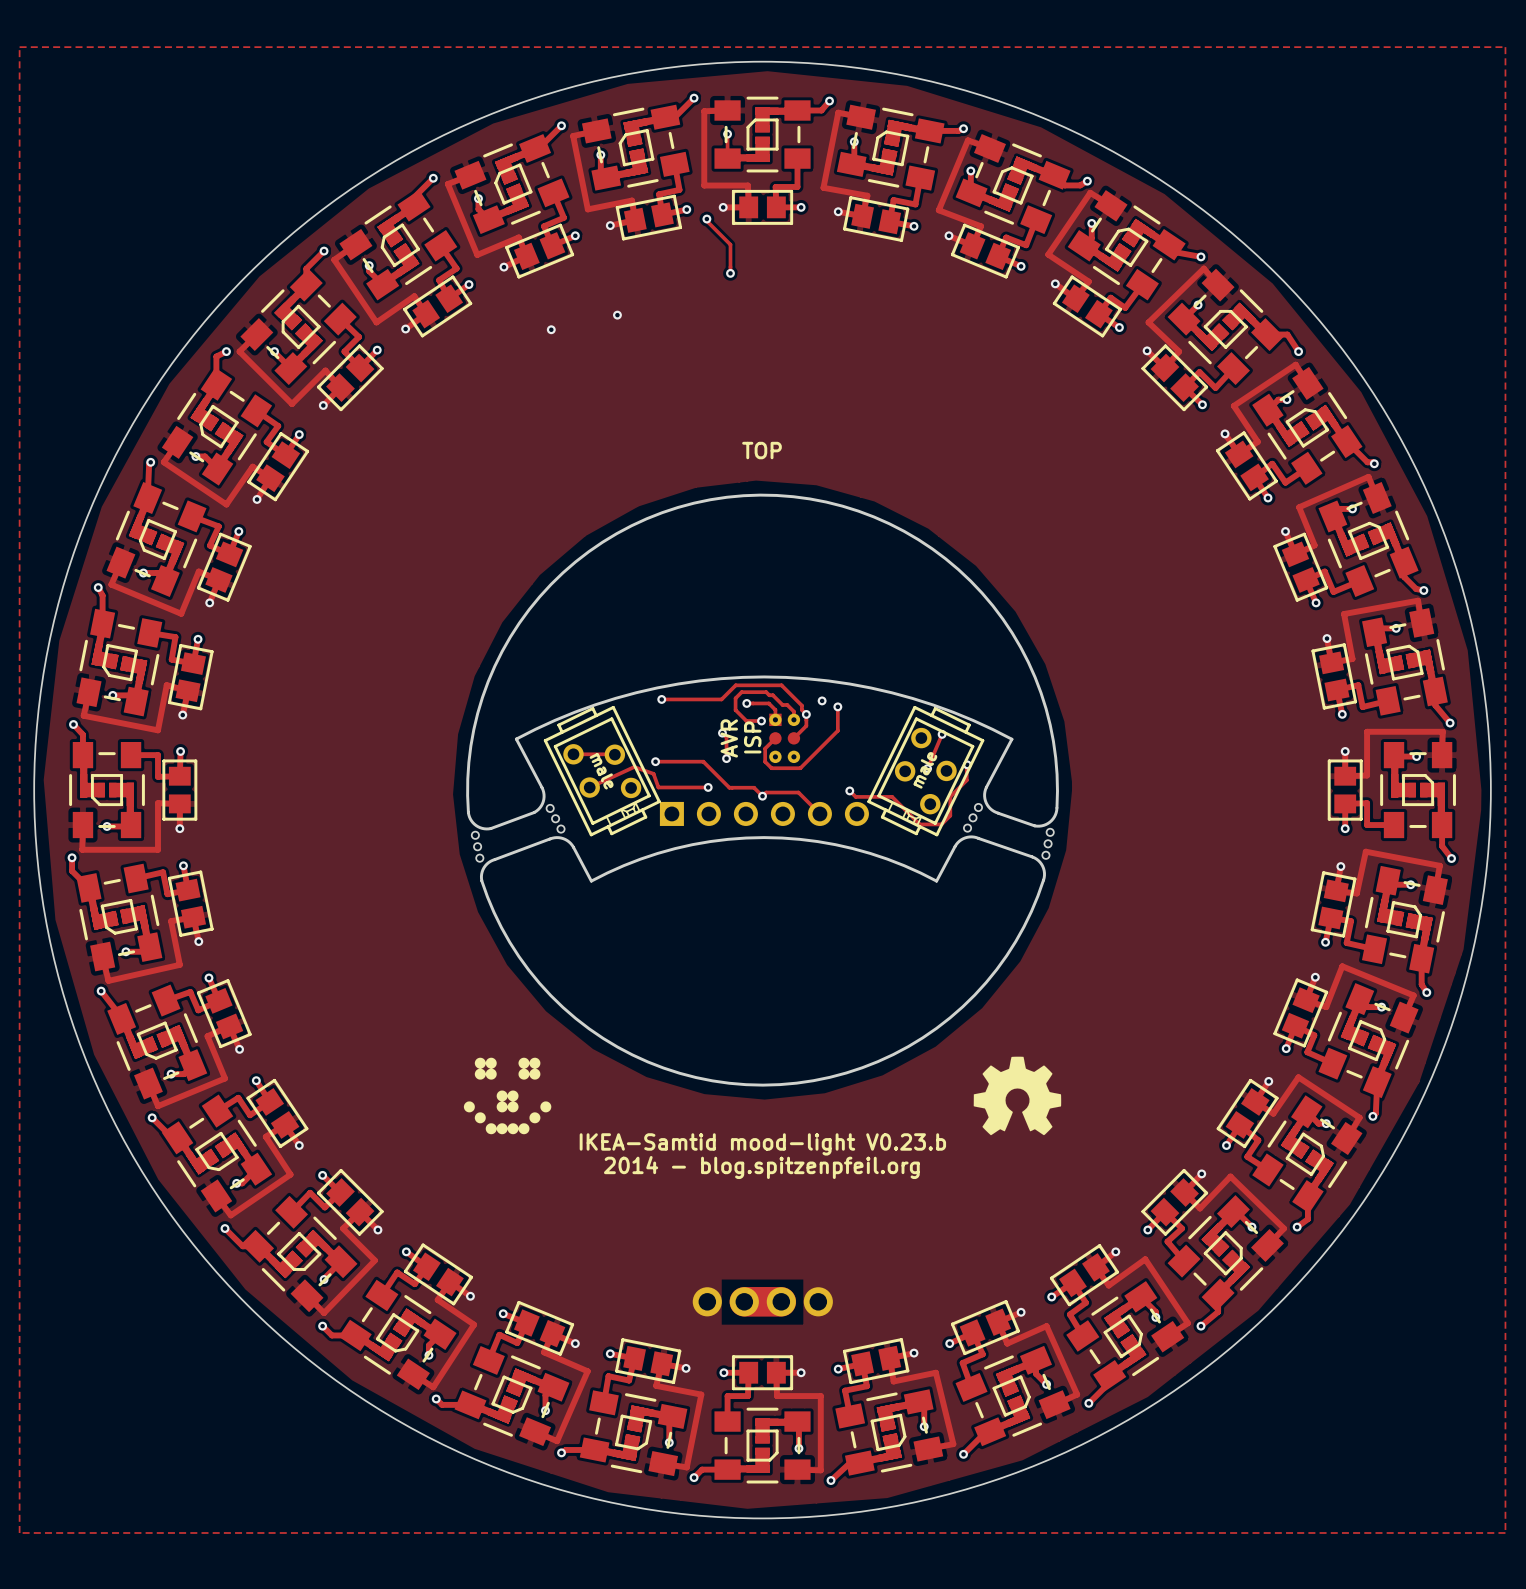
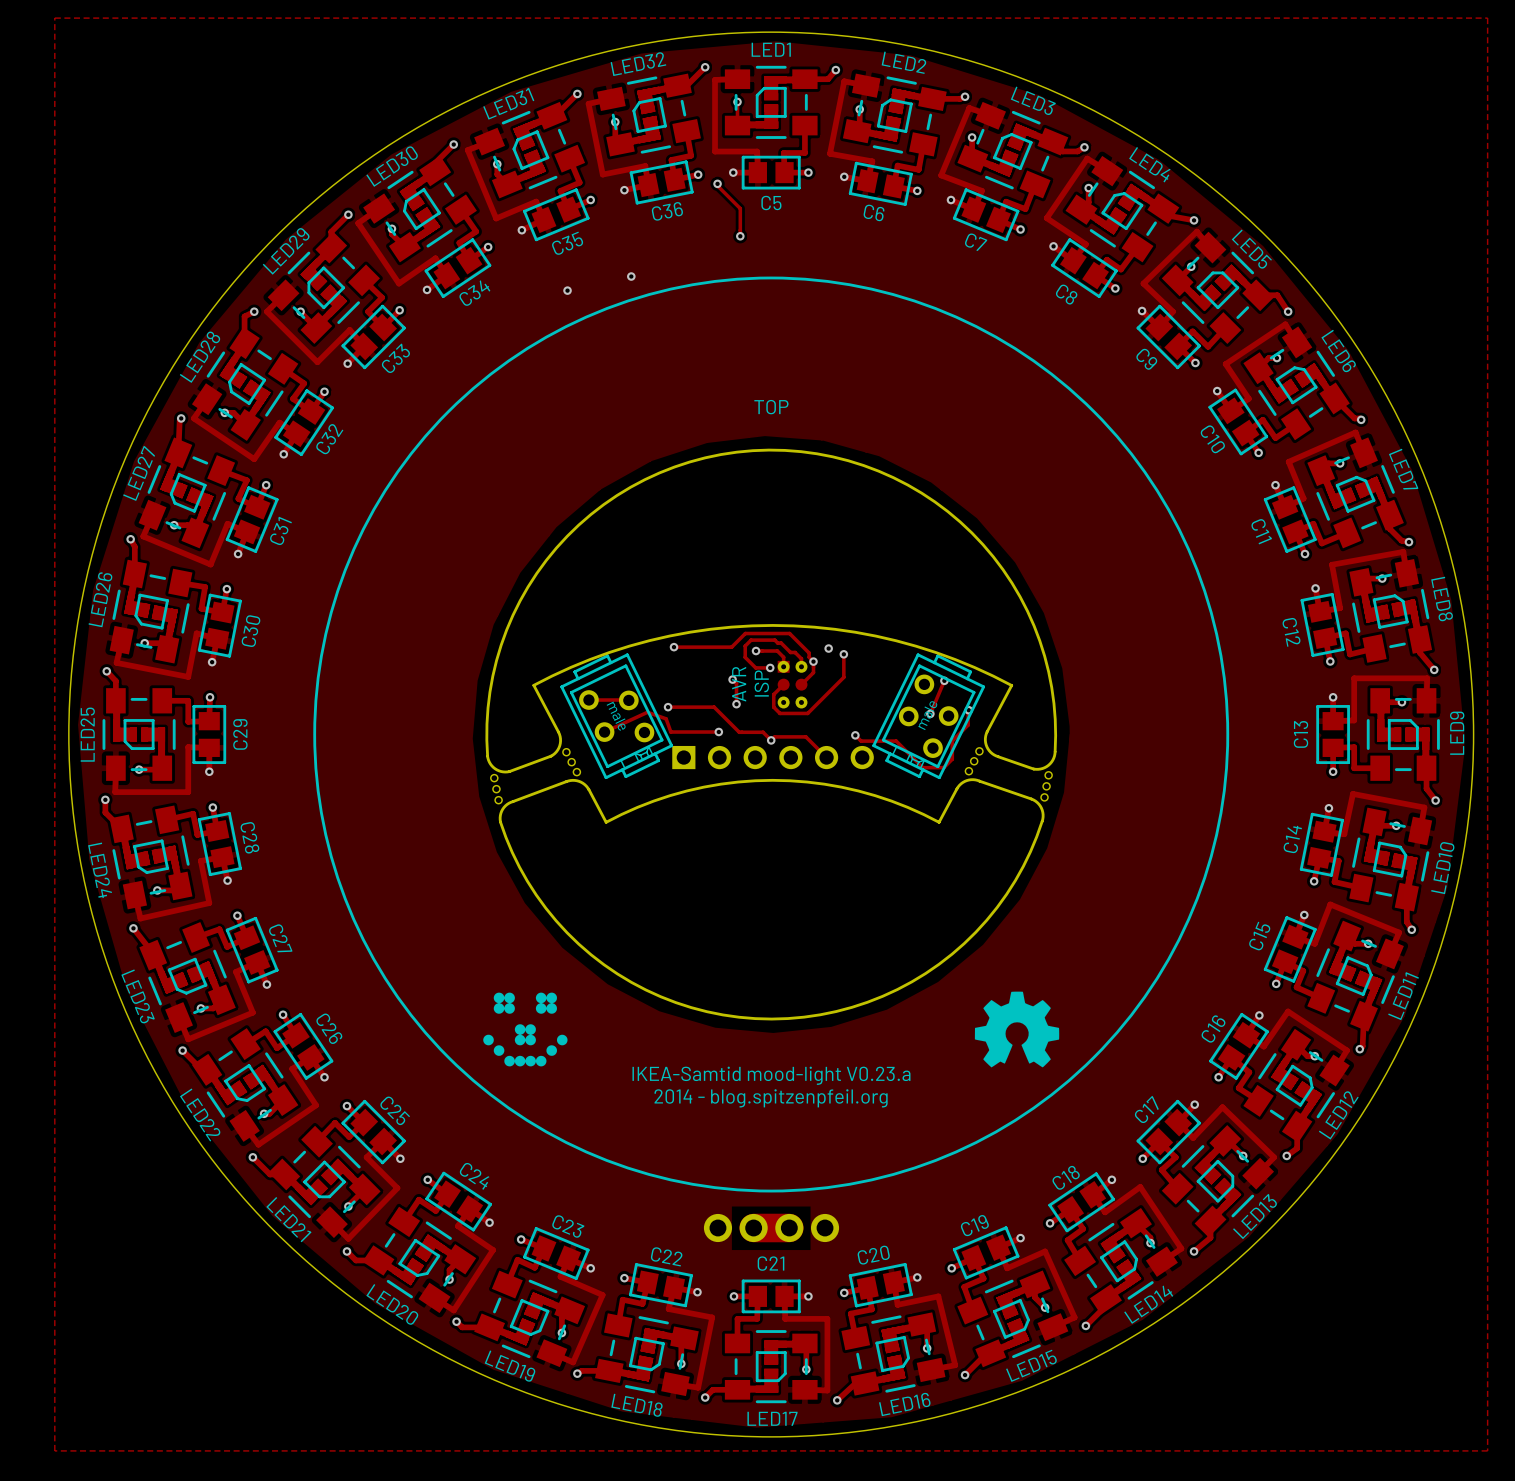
LED1 name: none -> LED1 (771, 49)
LED2 name: none -> LED2 (903, 62)
LED32 name: none -> LED32 (638, 64)
LED3 name: none -> LED3 (1033, 100)
LED31 name: none -> LED31 (508, 103)
LED4 name: none -> LED4 (1149, 164)
LED30 name: none -> LED30 (392, 166)
C5 name: none -> C5 (771, 203)
C36 name: none -> C36 (667, 211)
C6 name: none -> C6 (874, 212)
C7 name: none -> C7 (976, 242)
C35 name: none -> C35 (567, 243)
LED5 name: none -> LED5 (1251, 249)
LED29 name: none -> LED29 (286, 251)
drawing: none -> [313, 276, 1230, 1193]
C34 name: none -> C34 (474, 293)
C8 name: none -> C8 (1066, 294)
LED6 name: none -> LED6 (1338, 351)
LED28 name: none -> LED28 (200, 357)
C33 name: none -> C33 (395, 358)
C9 name: none -> C9 (1146, 359)
C32 name: none -> C32 (329, 439)
C10 name: none -> C10 (1212, 439)
LED7 name: none -> LED7 (1403, 469)
LED27 name: none -> LED27 (139, 473)
C31 name: none -> C31 (280, 530)
C11 name: none -> C11 (1261, 531)
LED8 name: none -> LED8 (1442, 599)
LED26 name: none -> LED26 (100, 599)
C30 name: none -> C30 (251, 631)
C12 name: none -> C12 (1291, 632)
LED9 name: none -> LED9 (1457, 733)
LED25 name: none -> LED25 (87, 734)
C29 name: none -> C29 (240, 734)
C13 name: none -> C13 (1300, 734)
C28 name: none -> C28 (249, 837)
C14 name: none -> C14 (1292, 839)
LED10 name: none -> LED10 (1442, 867)
LED24 name: none -> LED24 (100, 870)
C15 name: none -> C15 (1259, 936)
C27 name: none -> C27 (280, 938)
LED23 name: none -> LED23 (138, 996)
LED11 name: none -> LED11 (1403, 996)
C26 name: none -> C26 (329, 1028)
C16 name: none -> C16 (1213, 1028)
text: IKEA-Samtid mood-light V0.23.b (762, 1144) -> IKEA-Samtid mood-light V0.23.a (771, 1075)
C17 name: none -> C17 (1146, 1109)
C25 name: none -> C25 (395, 1110)
LED22 name: none -> LED22 (200, 1114)
LED12 name: none -> LED12 (1338, 1115)
C24 name: none -> C24 (474, 1176)
C18 name: none -> C18 (1066, 1177)
LED13 name: none -> LED13 (1255, 1216)
LED21 name: none -> LED21 (288, 1219)
C19 name: none -> C19 (974, 1225)
C23 name: none -> C23 (568, 1226)
C20 name: none -> C20 (873, 1255)
C22 name: none -> C22 (666, 1256)
C21 name: none -> C21 (771, 1263)
LED20 name: none -> LED20 (392, 1304)
LED14 name: none -> LED14 (1148, 1304)
LED19 name: none -> LED19 (510, 1366)
LED15 name: none -> LED15 (1031, 1365)
LED16 name: none -> LED16 (904, 1404)
LED18 name: none -> LED18 (637, 1405)
LED17 name: none -> LED17 (772, 1418)

